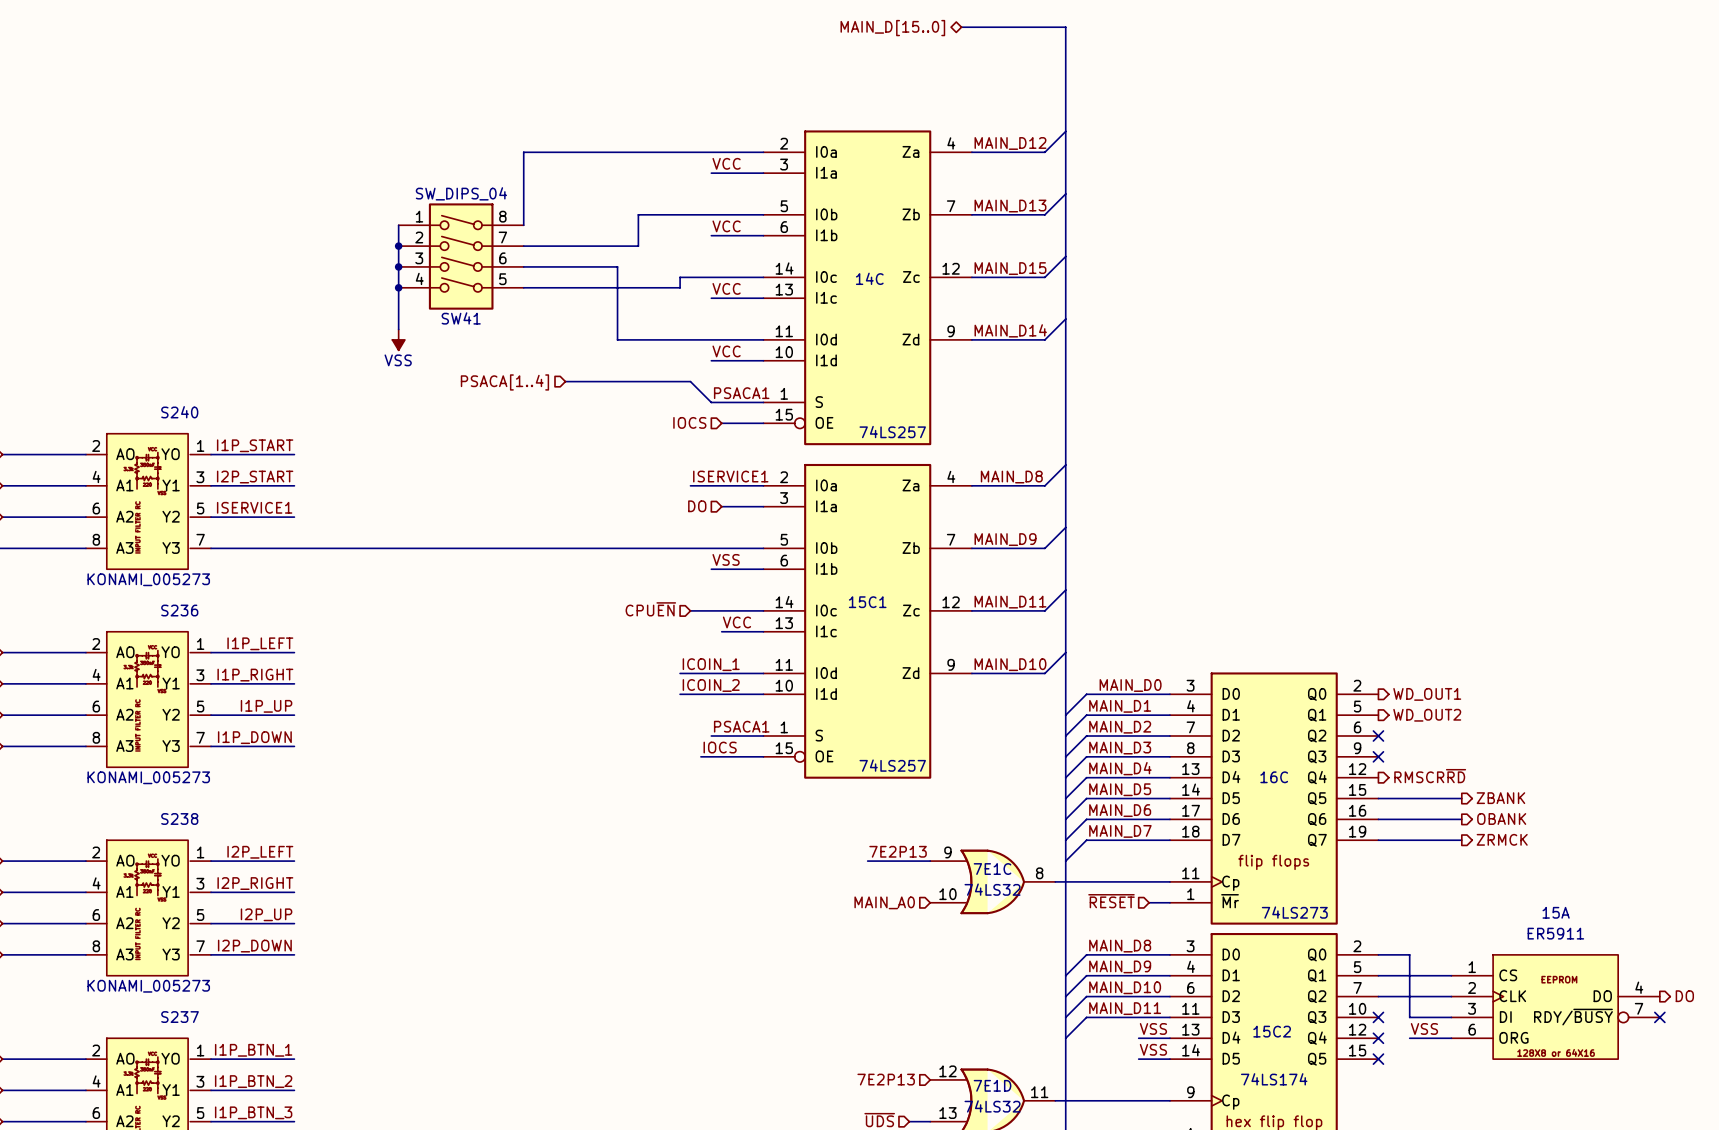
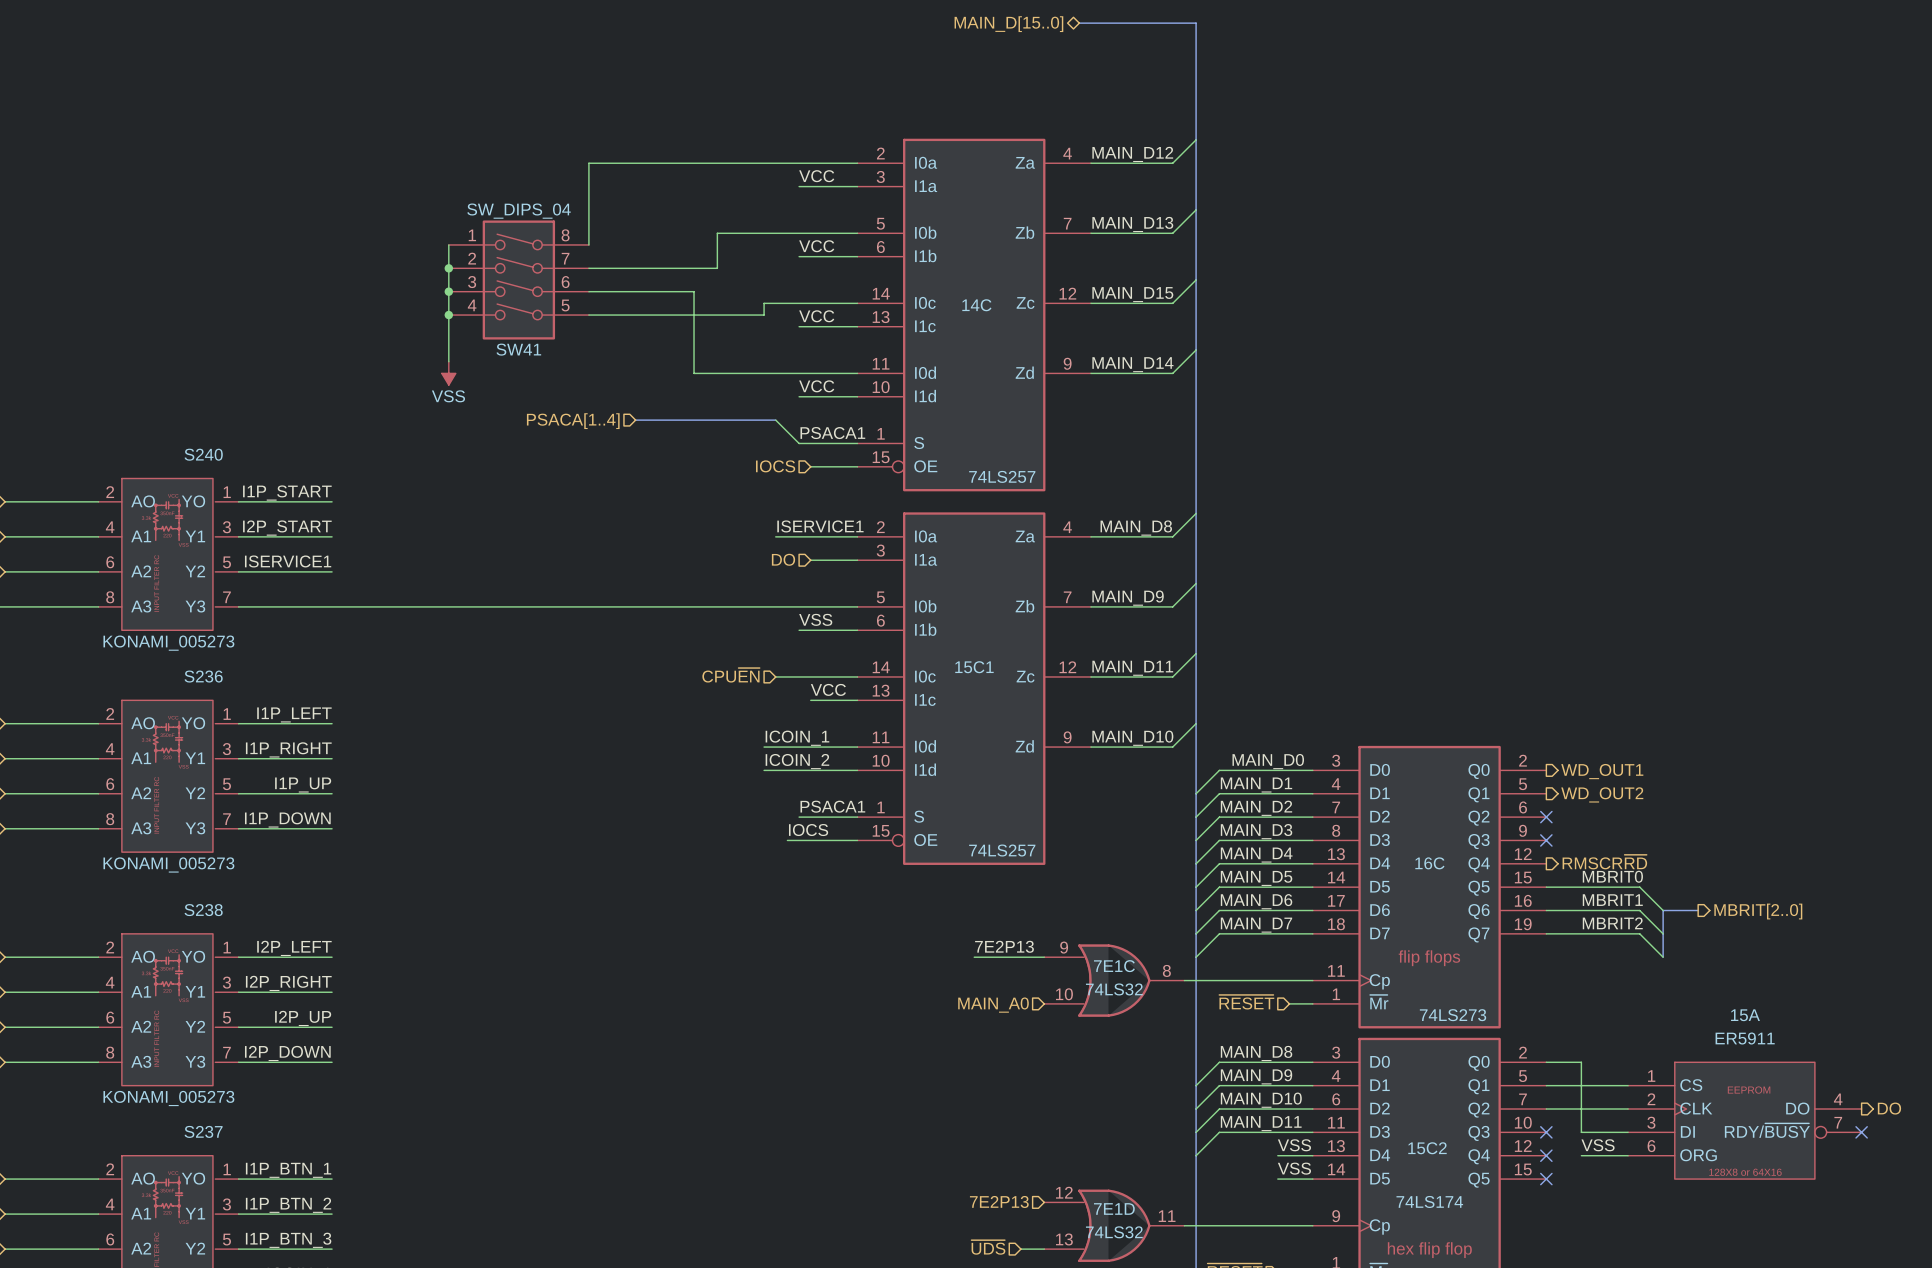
label: none -> MBRIT0 (1612, 876)
wire: none -> (1639, 887) (1663, 910)
hierarchical label: ZBANK (1500, 798) -> none
label: none -> MBRIT1 (1612, 900)
hierarchical label: OBANK (1501, 818) -> none
wire: none -> (1639, 910) (1663, 933)
bus: none -> (1698, 910) (1663, 910) (1663, 957)
hierarchical label: none -> MBRIT[2..0] (1758, 911)
label: none -> MBRIT2 (1612, 923)
hierarchical label: ZRMCK (1502, 839) -> none
wire: none -> (1639, 933) (1663, 957)

